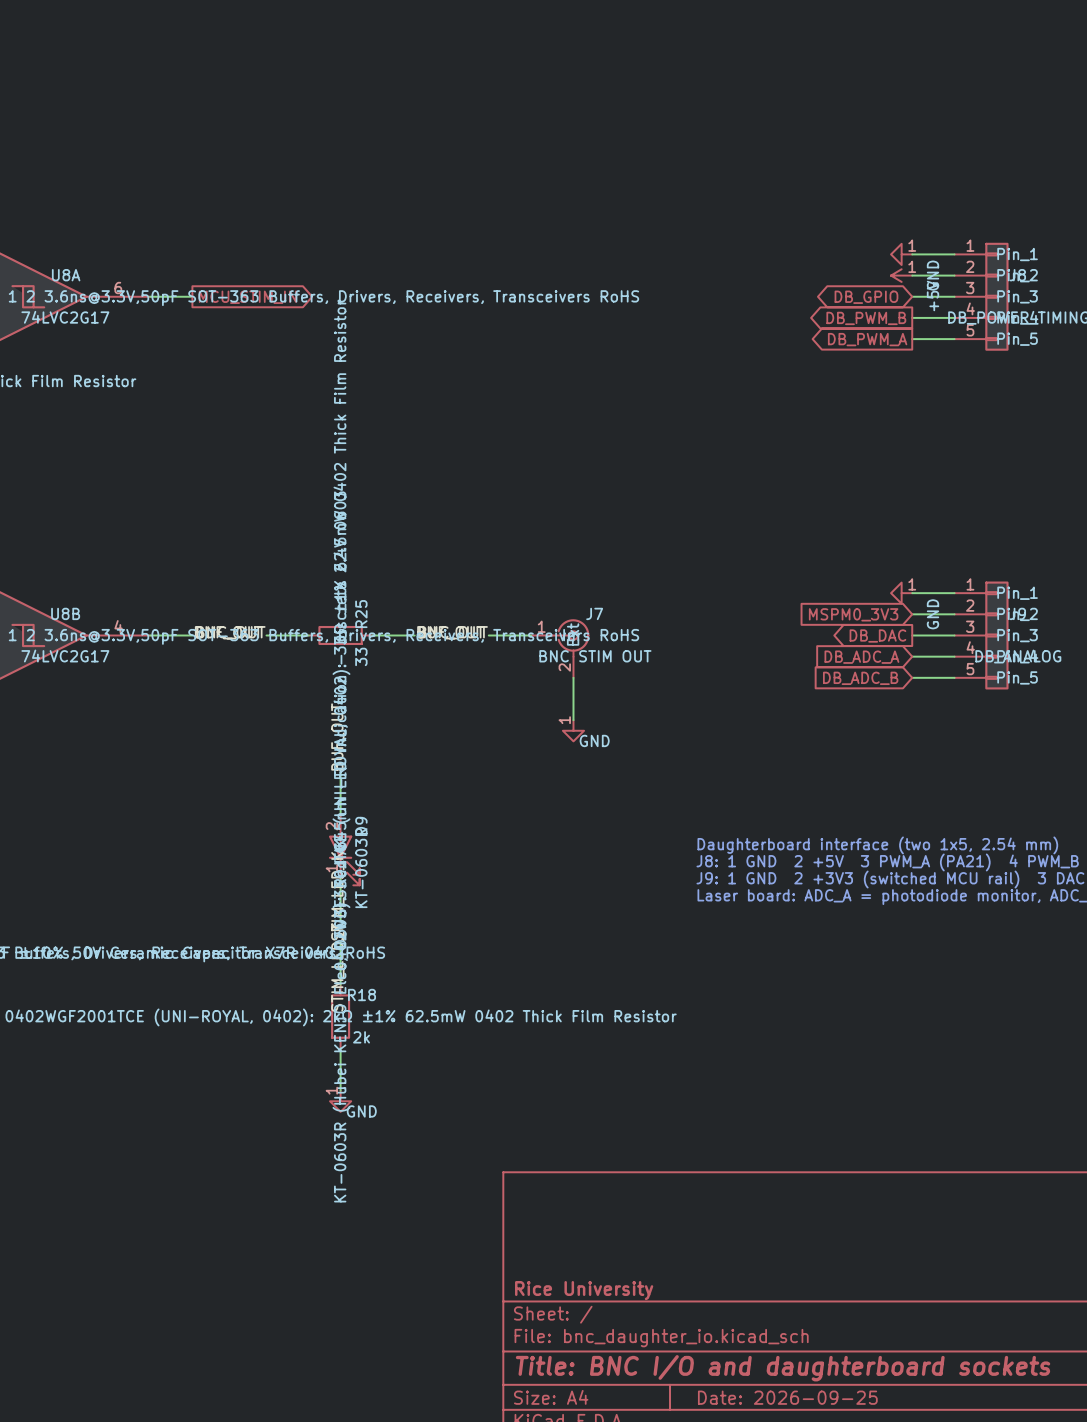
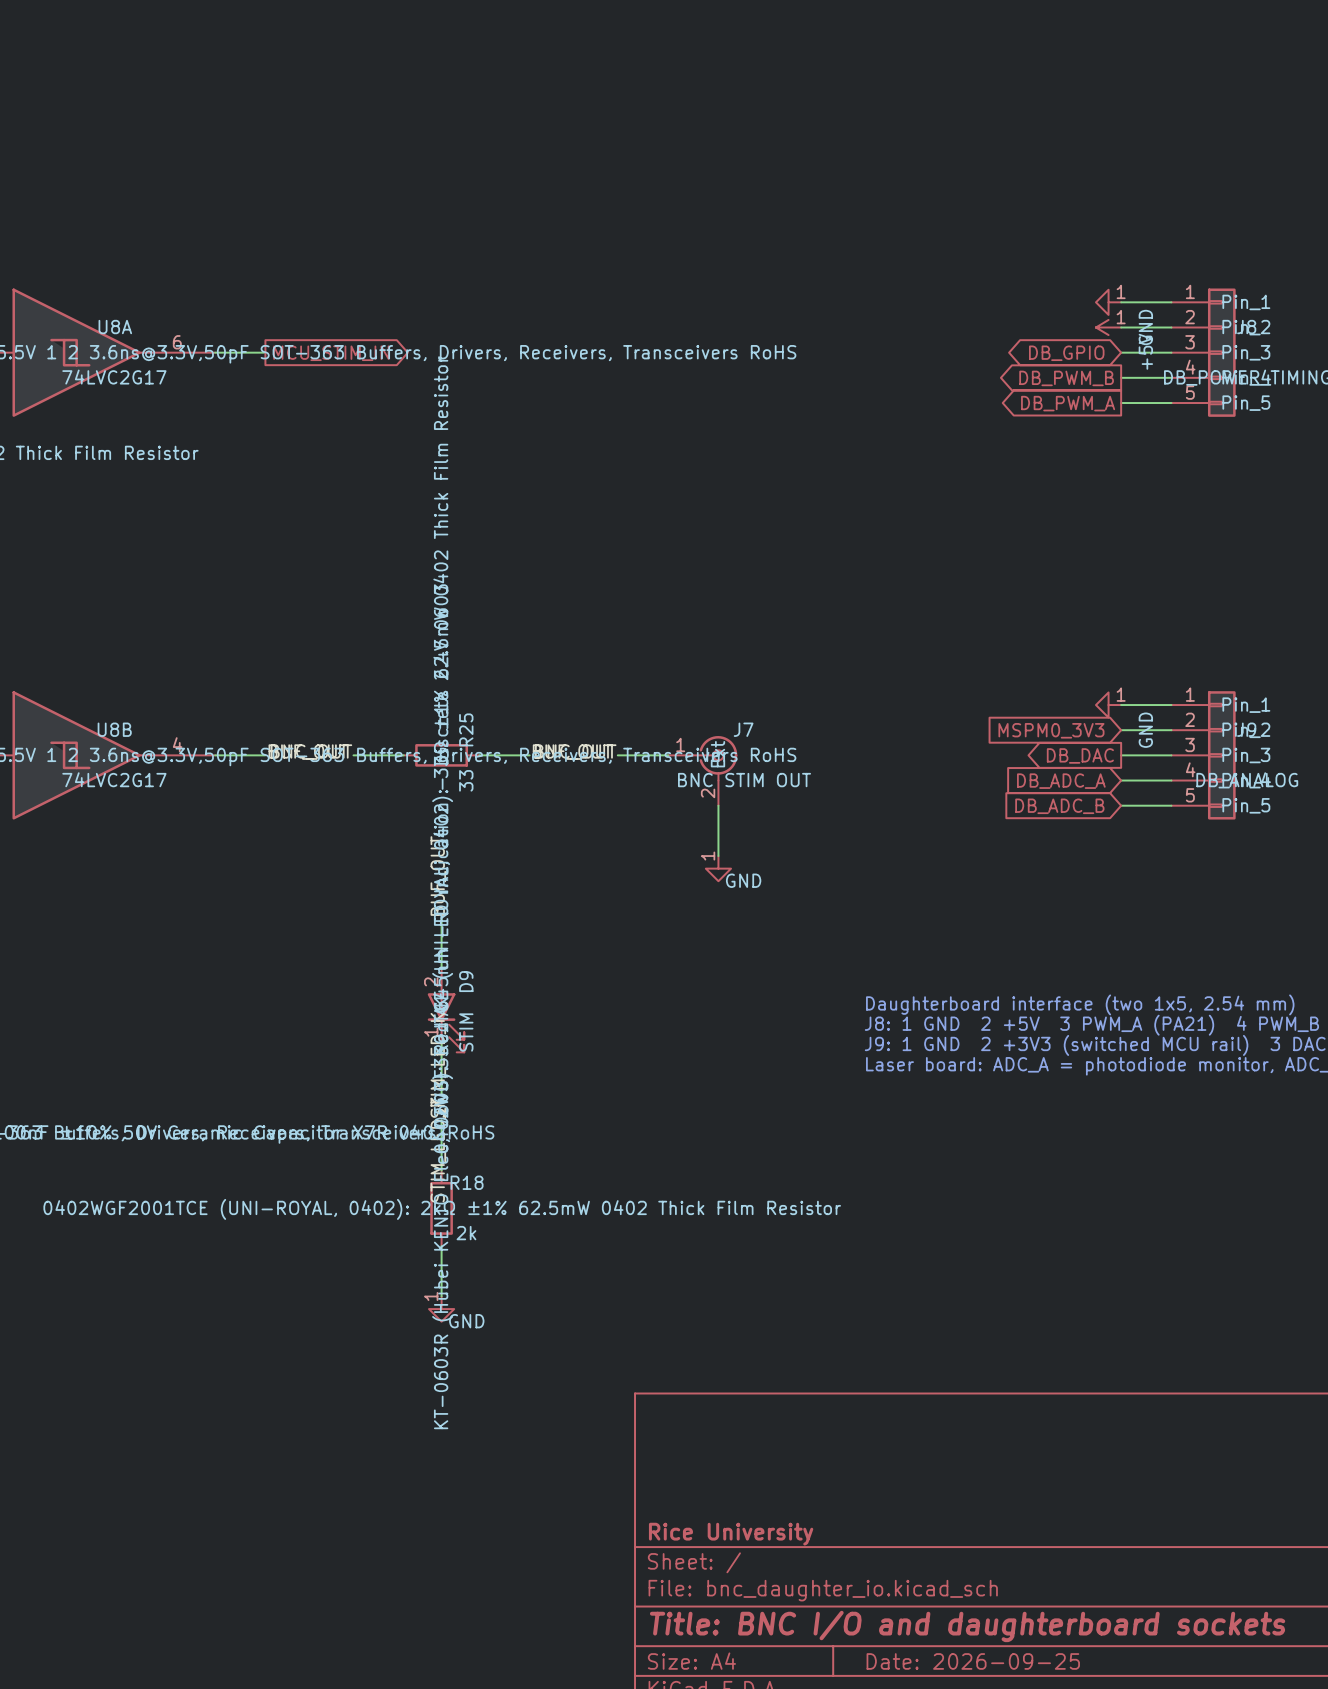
D9 value: KT-0603R (361, 868) -> STIM (466, 1032)

